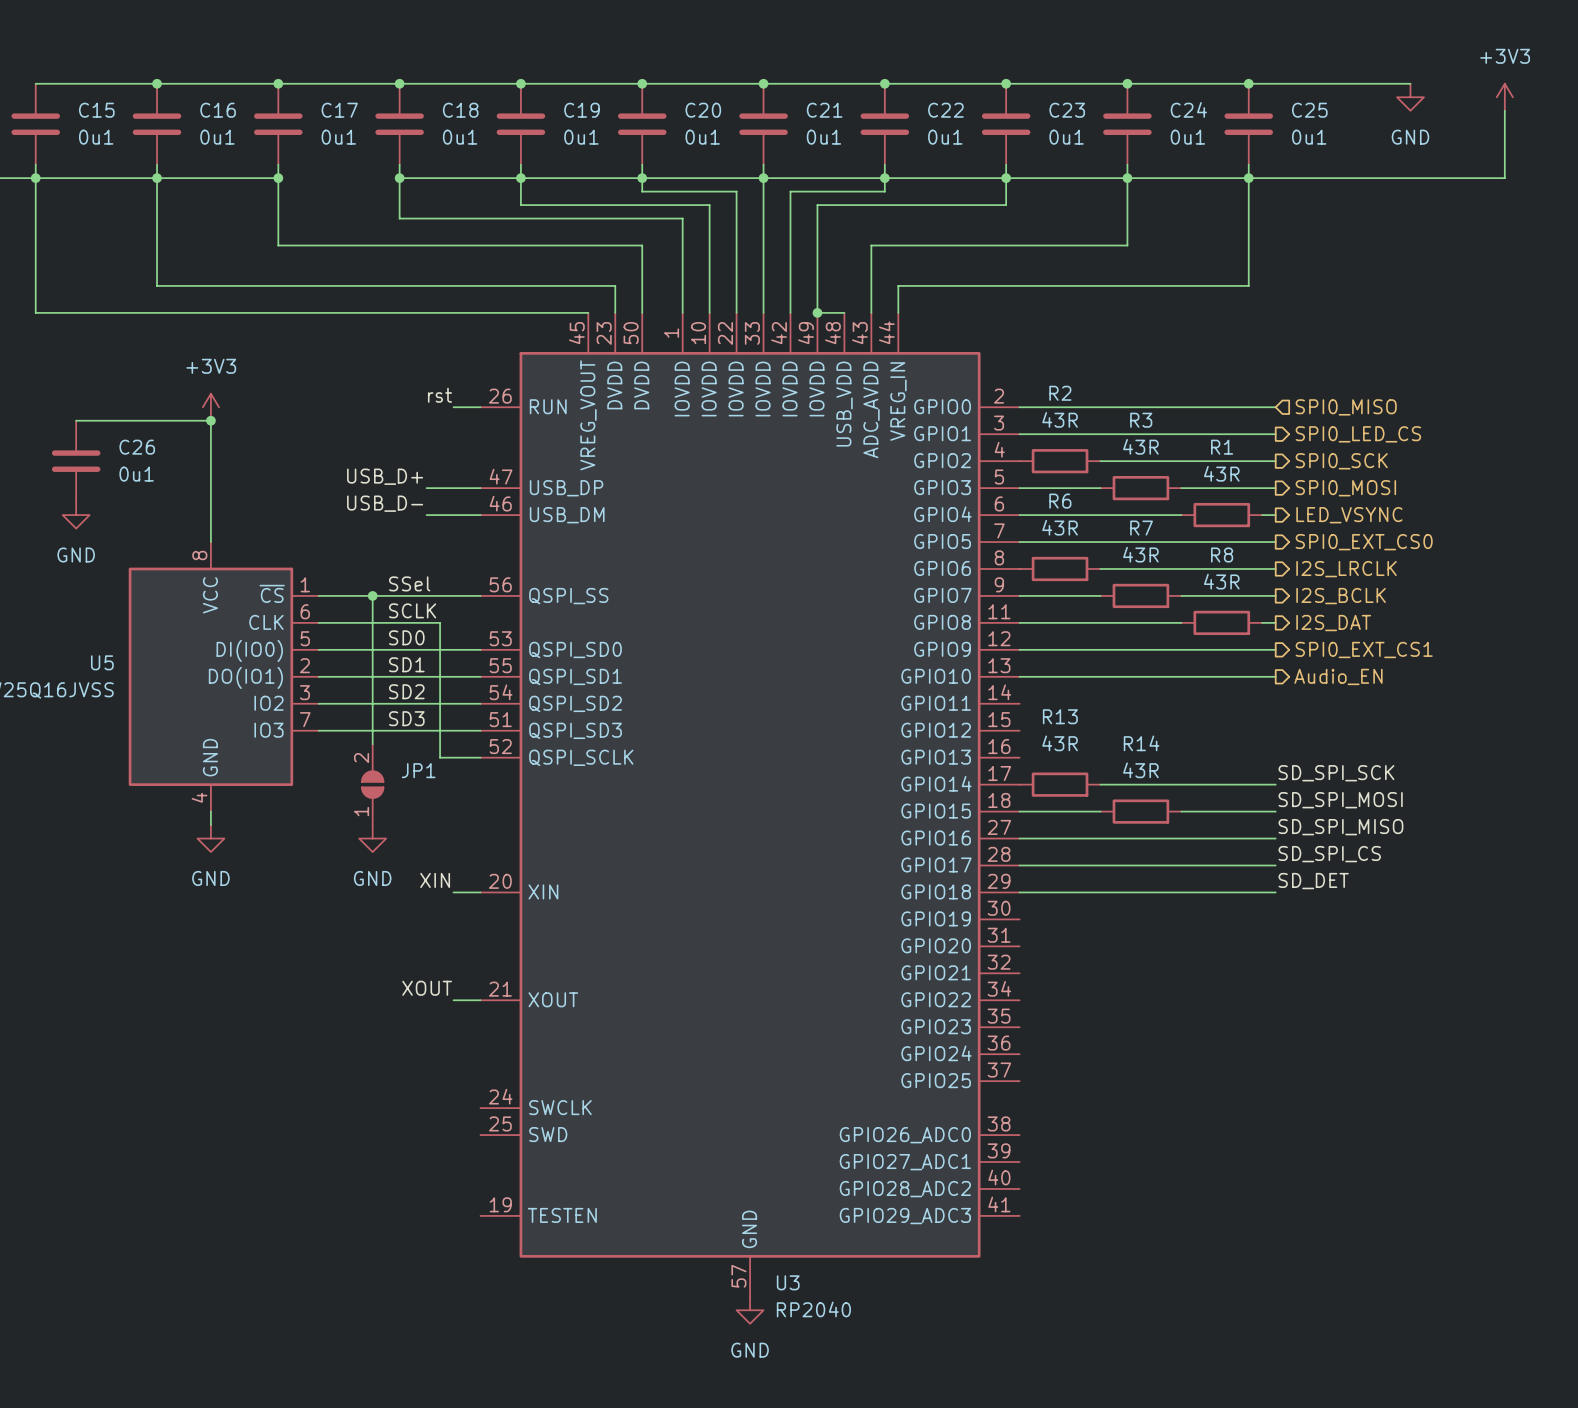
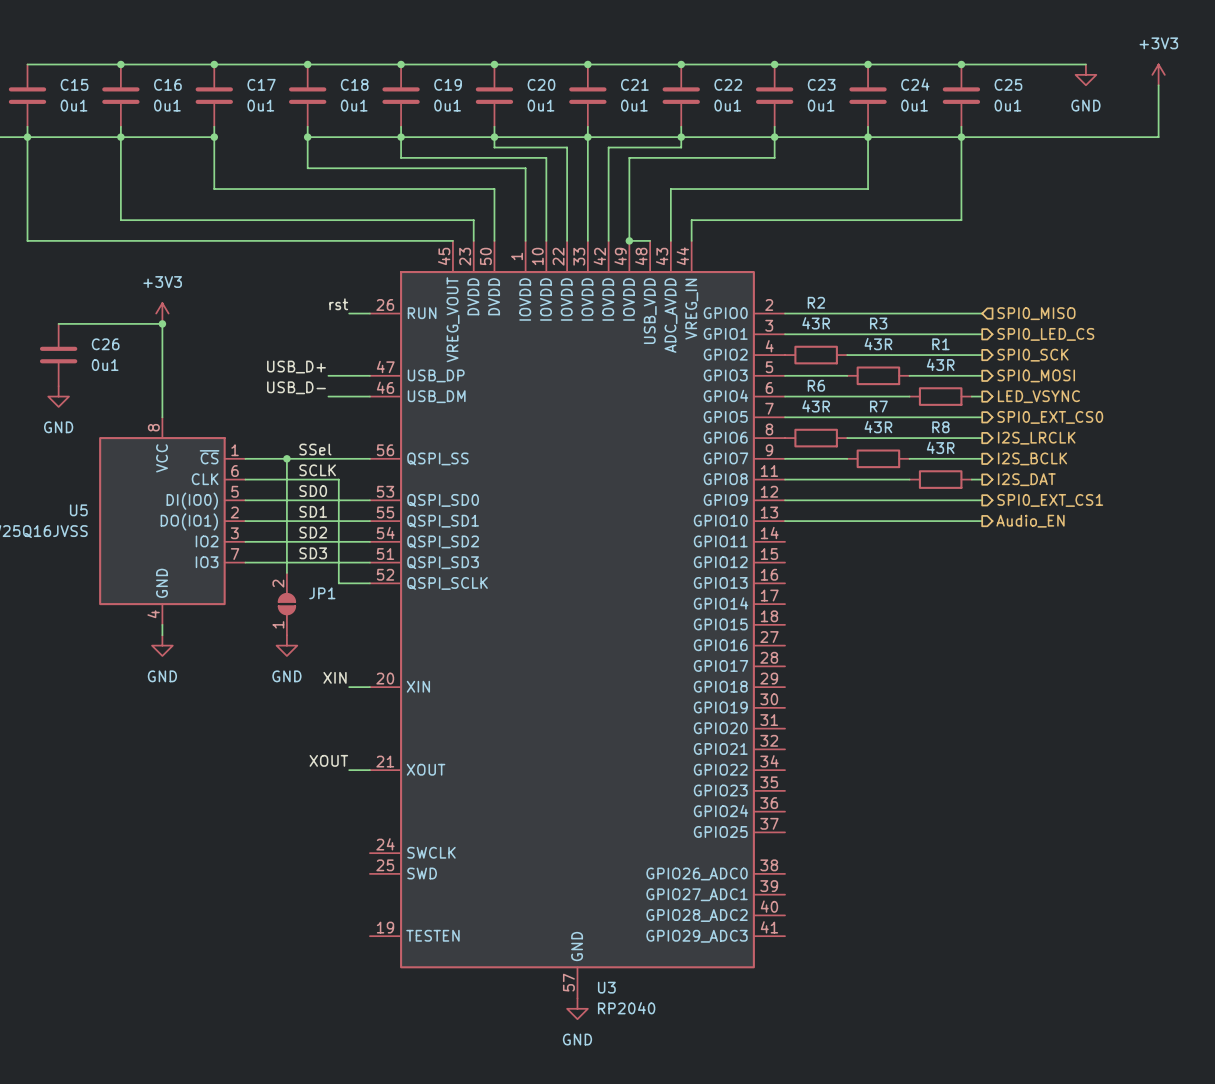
label: SD_SPI_SCK (1336, 773) -> none
R13: 43R (1060, 784) -> none
wire: (1100, 784) (1275, 784) -> none
label: SD_SPI_MOSI (1340, 800) -> none
wire: (1019, 811) (1100, 811) -> none
R14: 43R (1140, 811) -> none
wire: (1181, 811) (1275, 811) -> none
label: SD_SPI_MISO (1340, 827) -> none
wire: (1019, 838) (1275, 838) -> none
label: SD_SPI_CS (1329, 854) -> none
wire: (1019, 865) (1275, 865) -> none
label: SD_DET (1313, 881) -> none
wire: (1019, 892) (1275, 892) -> none

